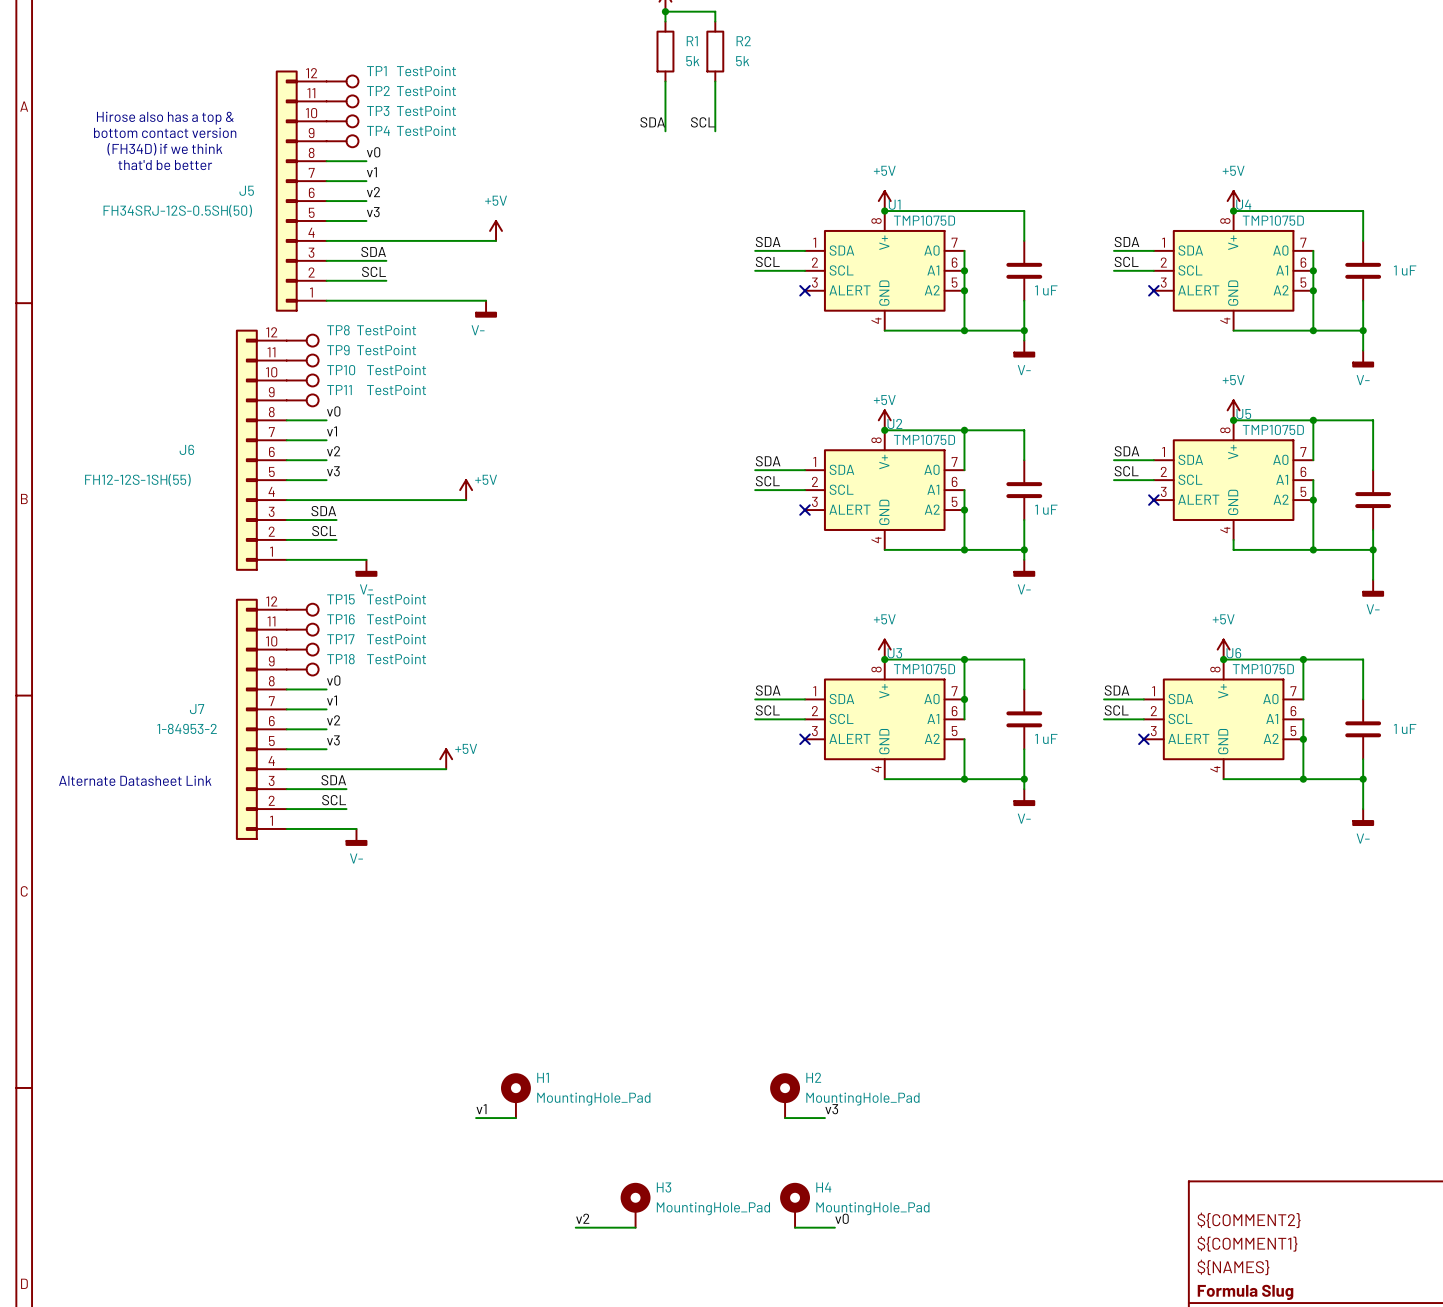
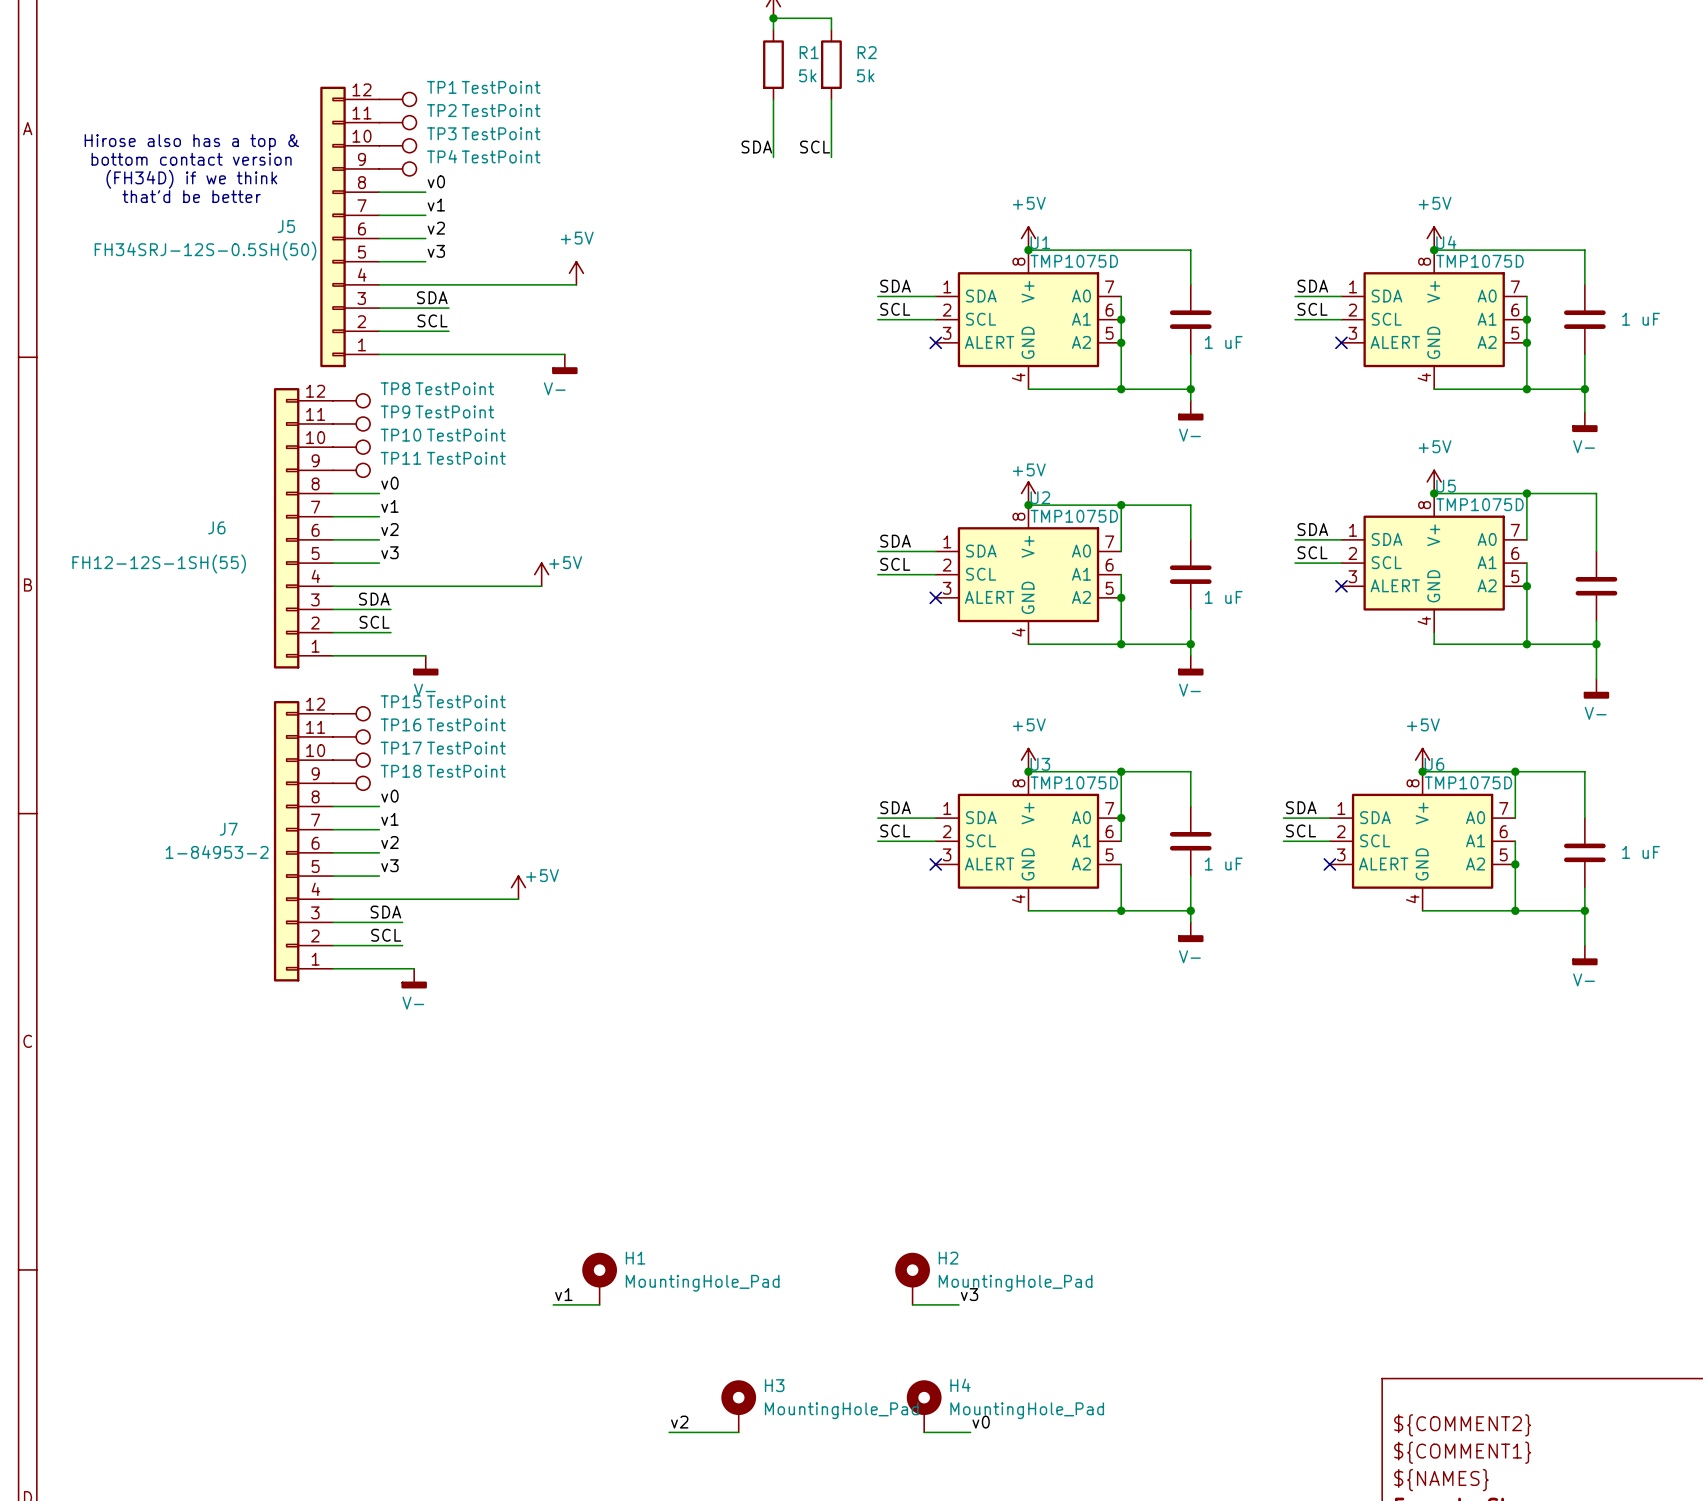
text: Alternate Datasheet Link (135, 780) -> none

